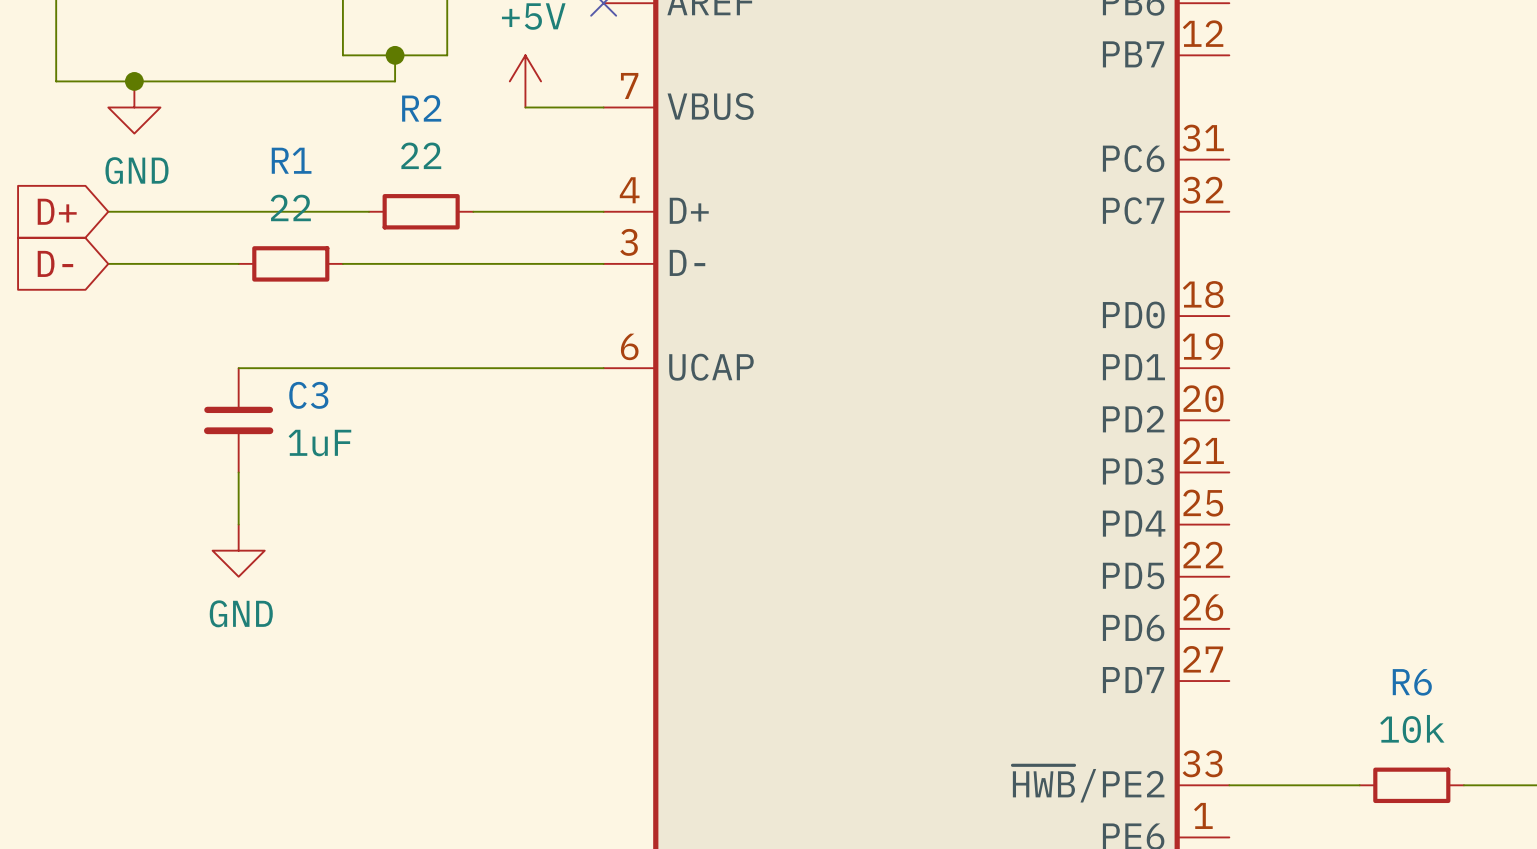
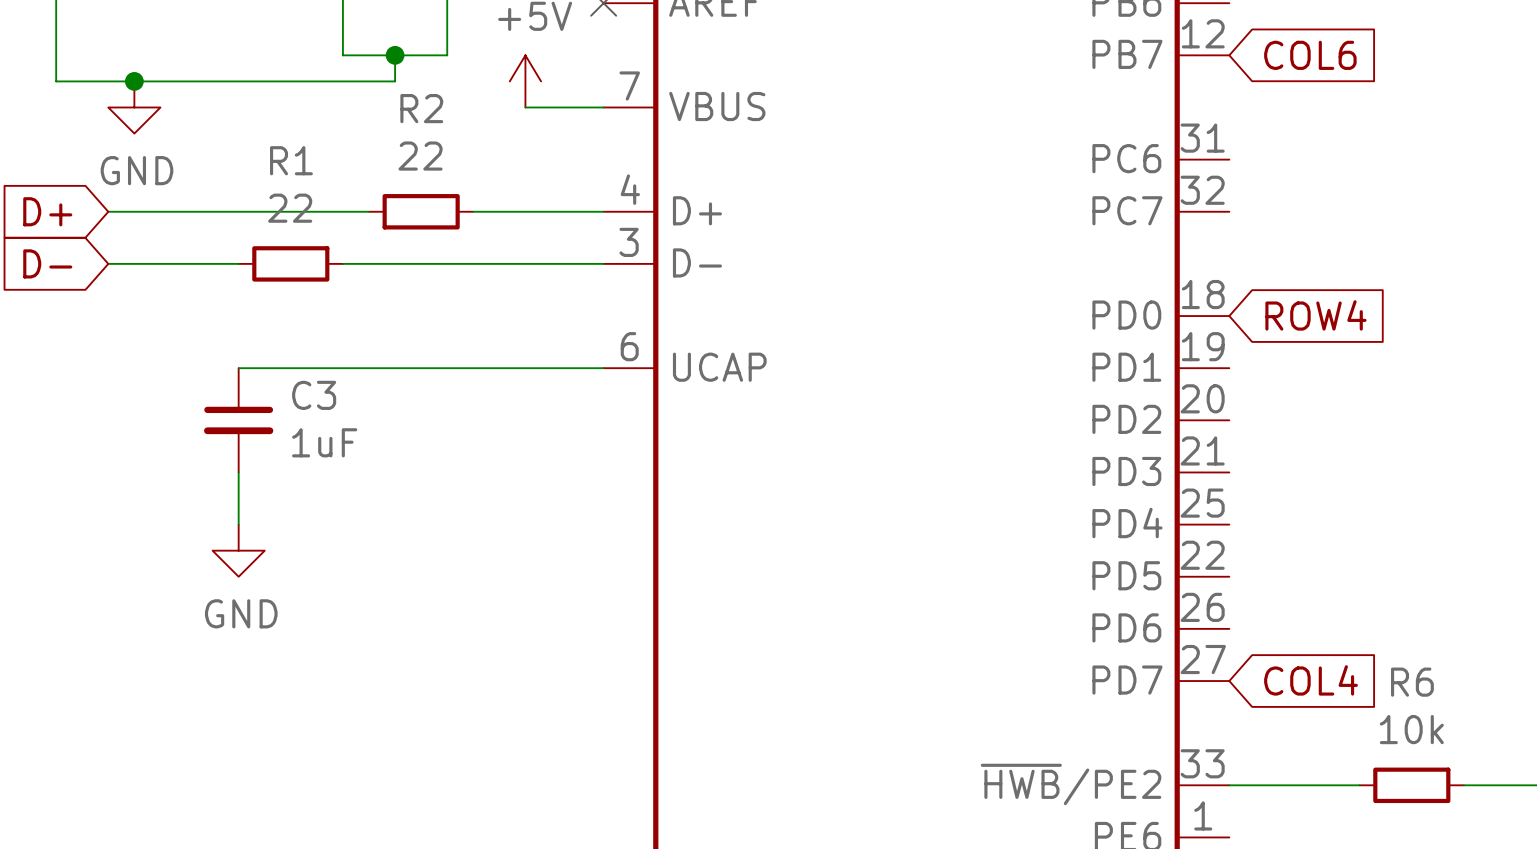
global label: none -> COL6 (1310, 55)
global label: none -> ROW4 (1315, 315)
global label: none -> COL4 (1310, 680)

